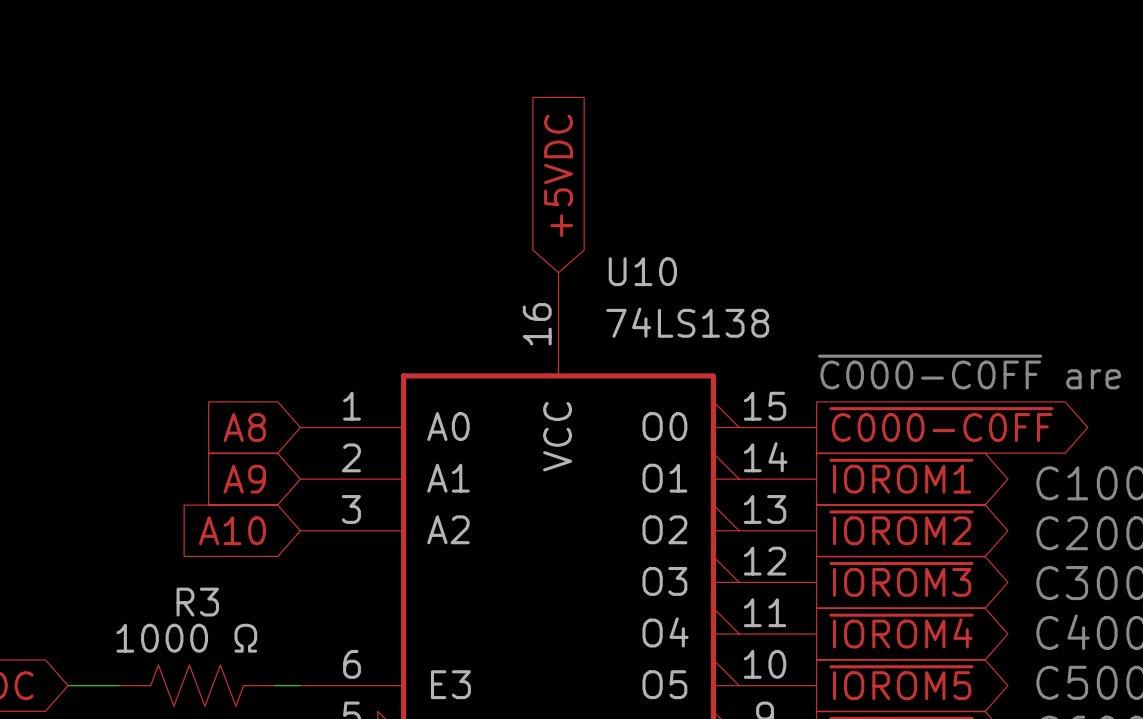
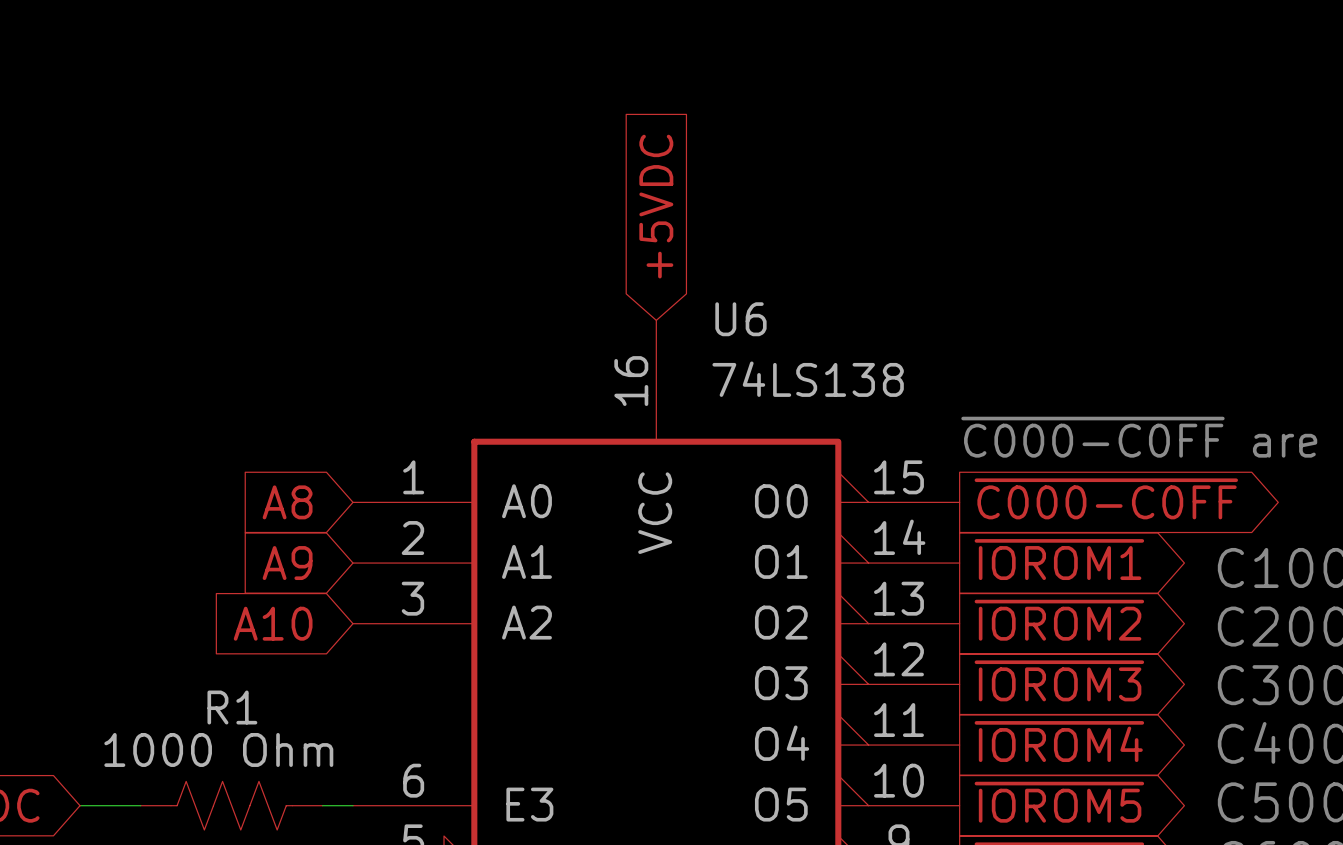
U10 name: U10 (642, 271) -> U6 (740, 319)
R3 name: R3 (197, 602) -> R1 (232, 707)
R3 value: 1000 Ω (186, 638) -> 1000 Ohm (218, 749)

